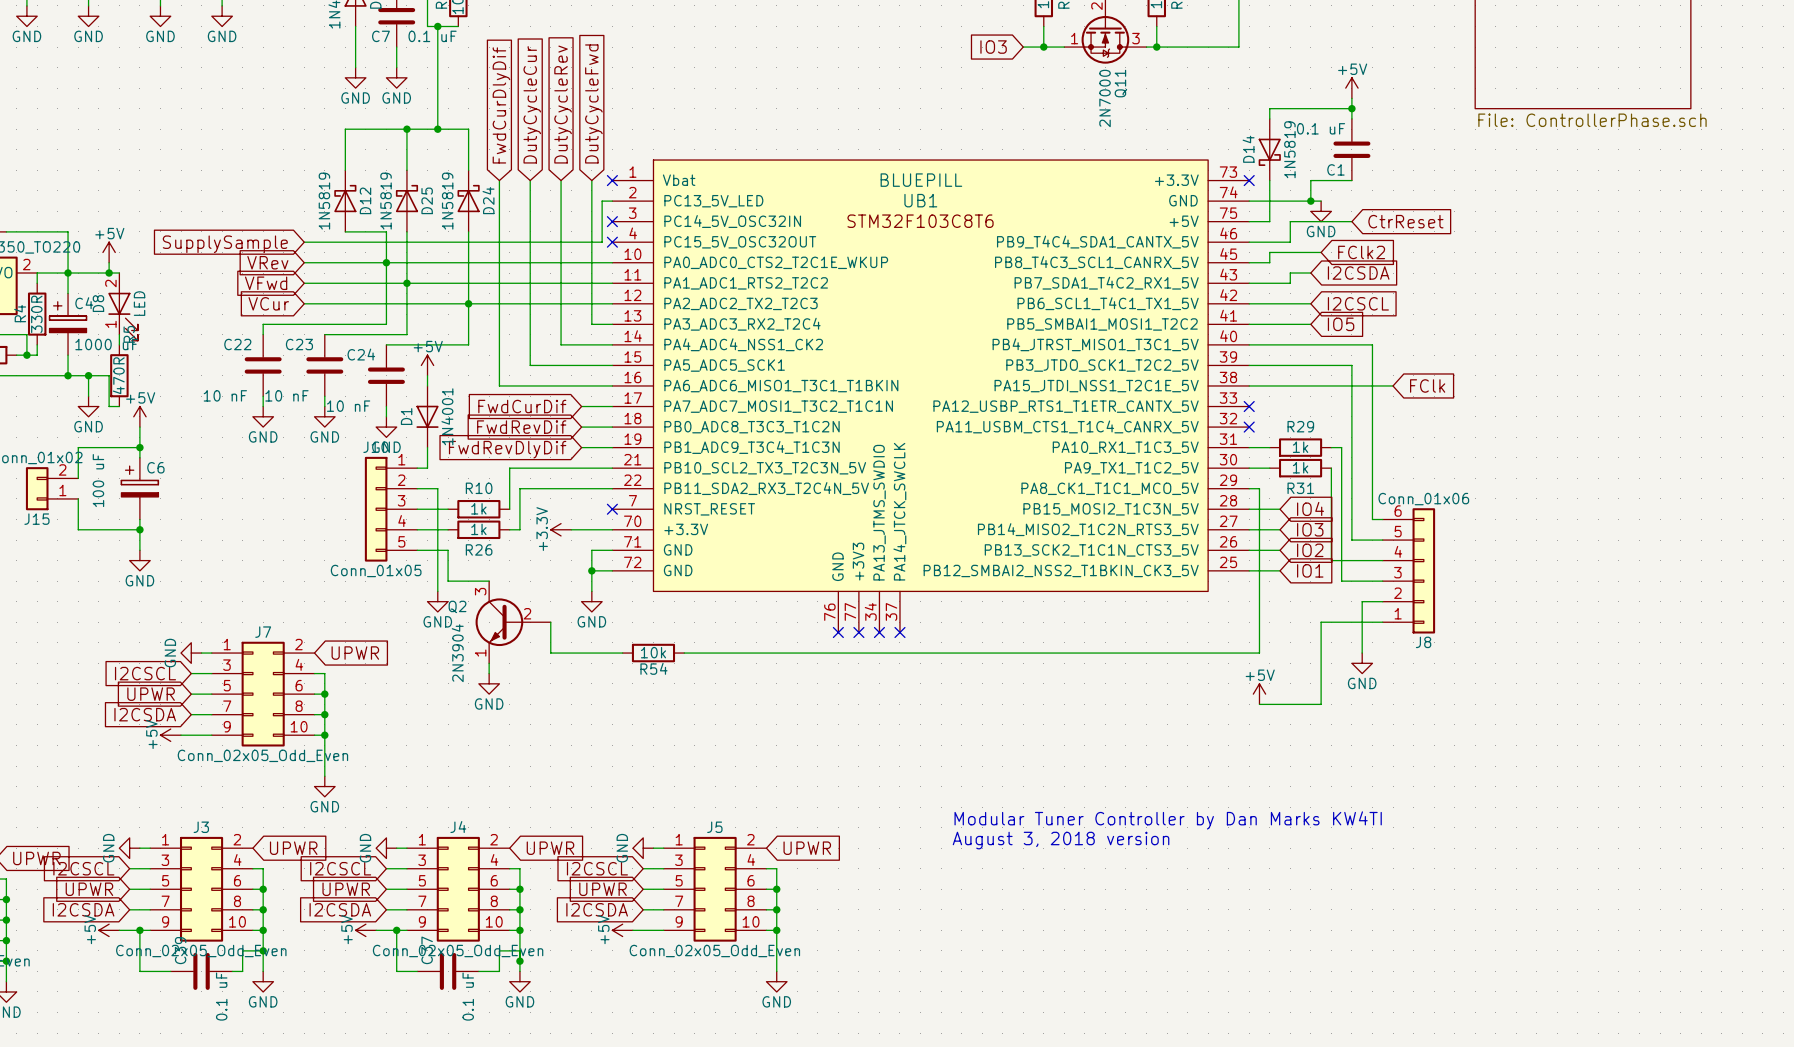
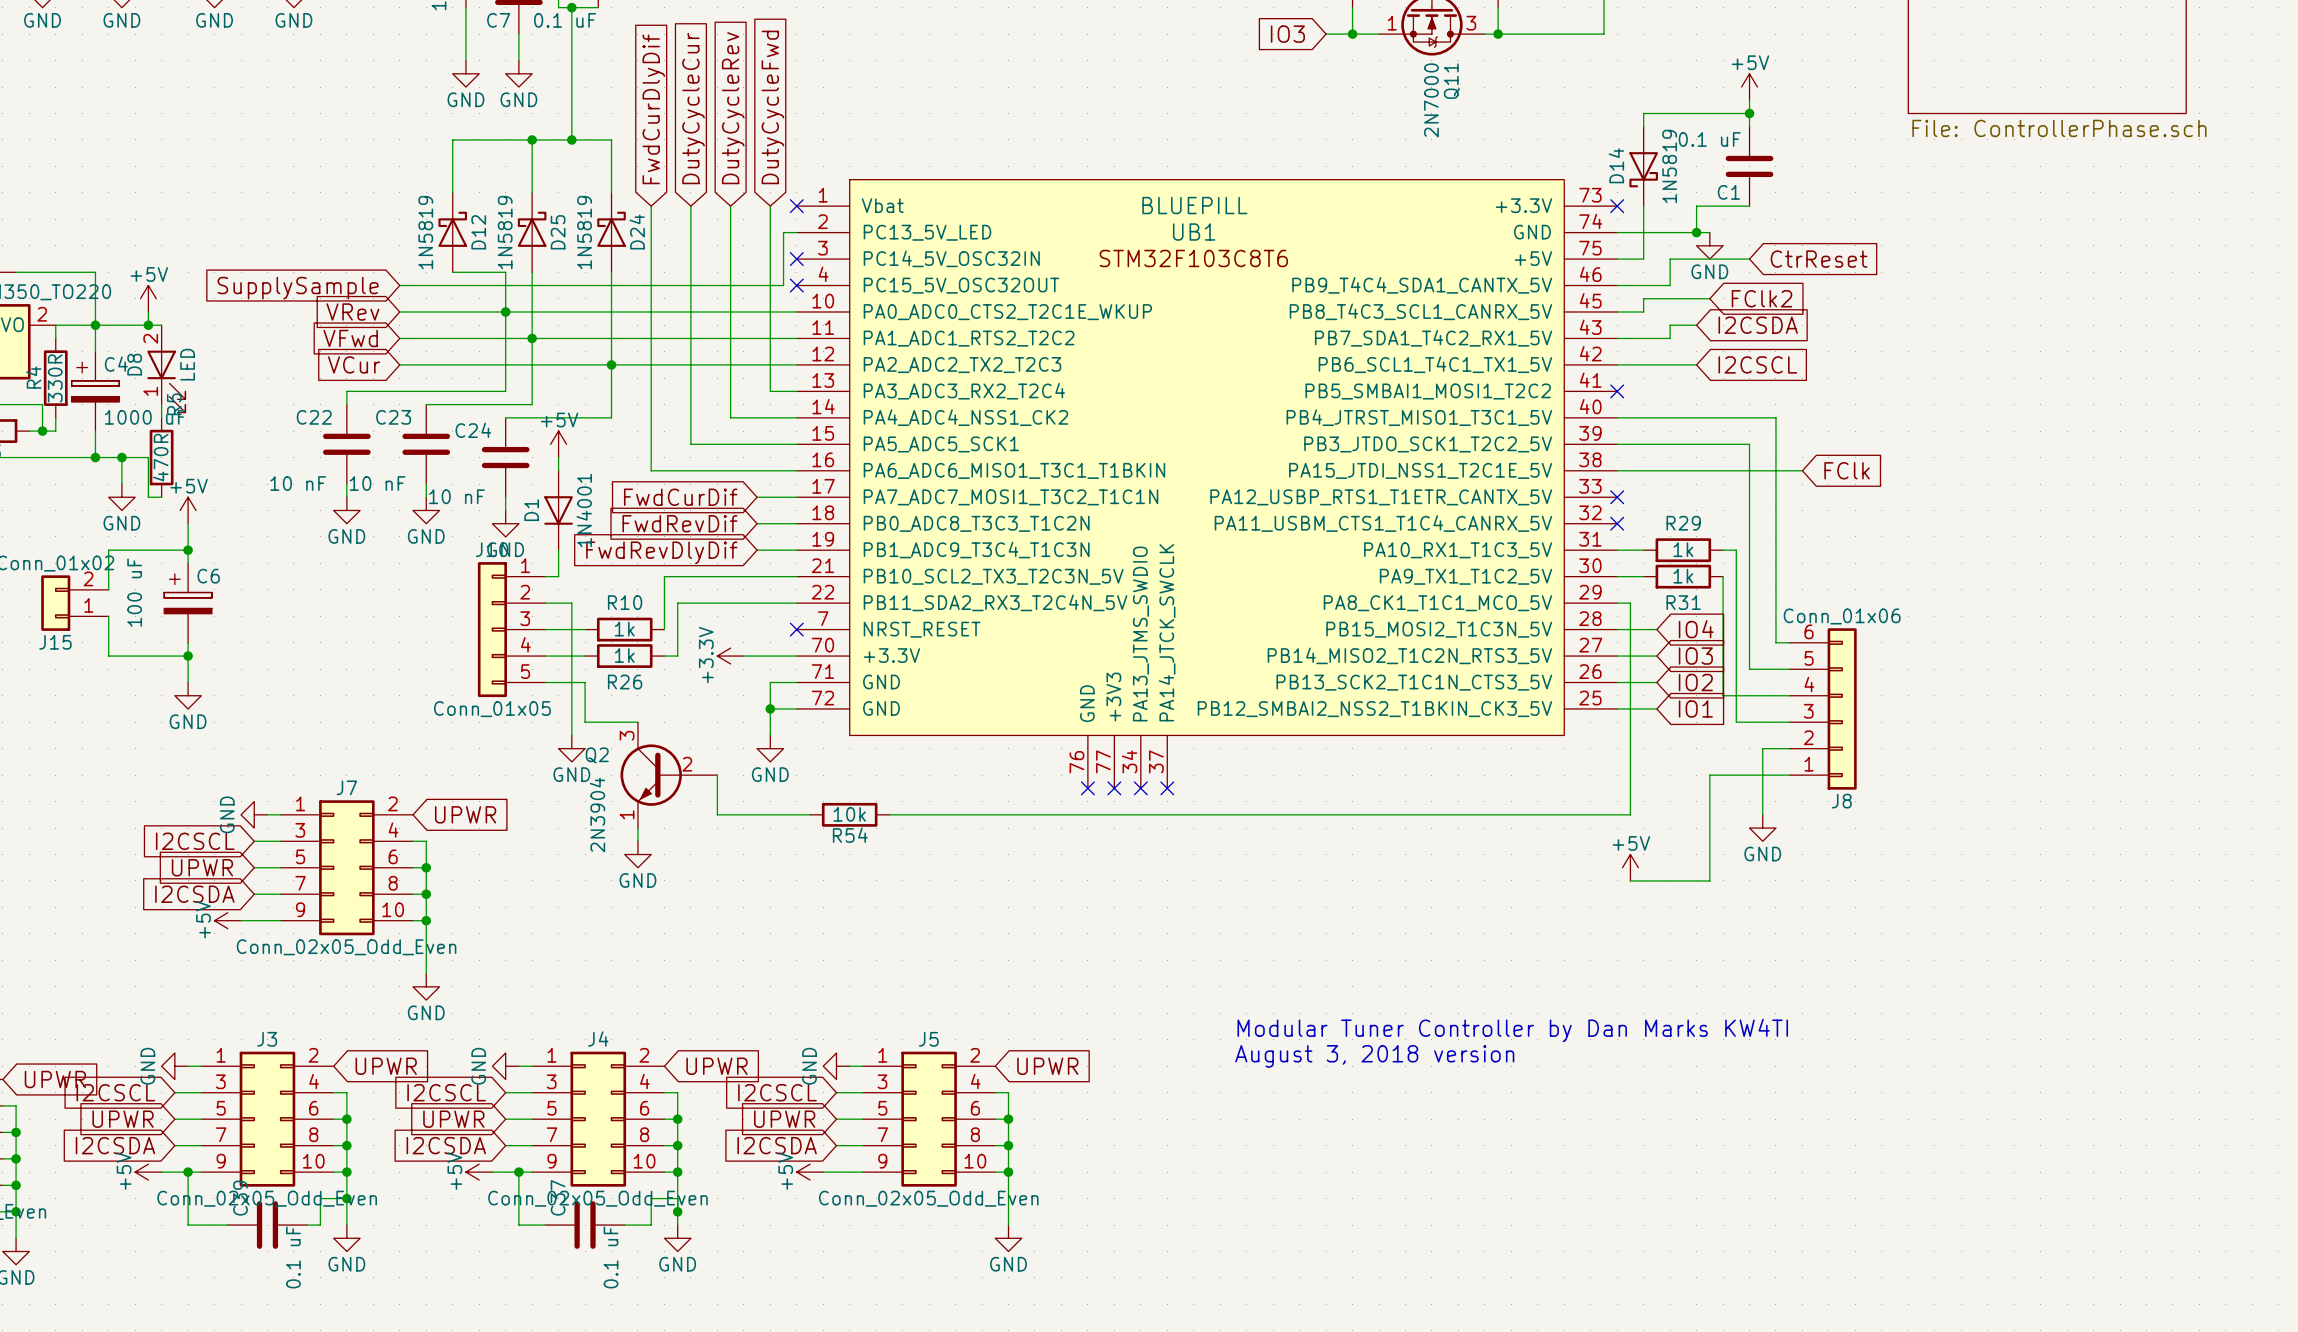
wire: (1249, 324) (1310, 324) -> none
no-connect mark: none -> (1617, 391)
global label: IO5 (1341, 324) -> none

